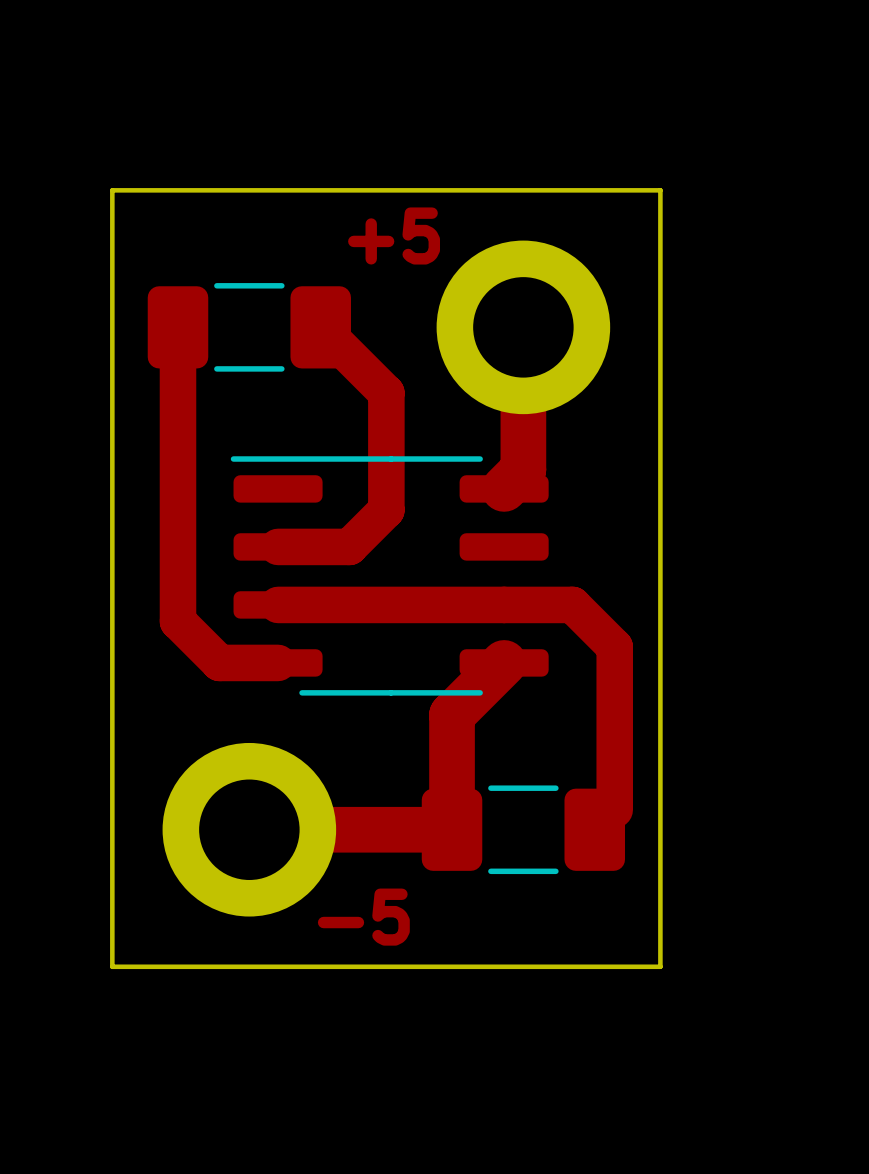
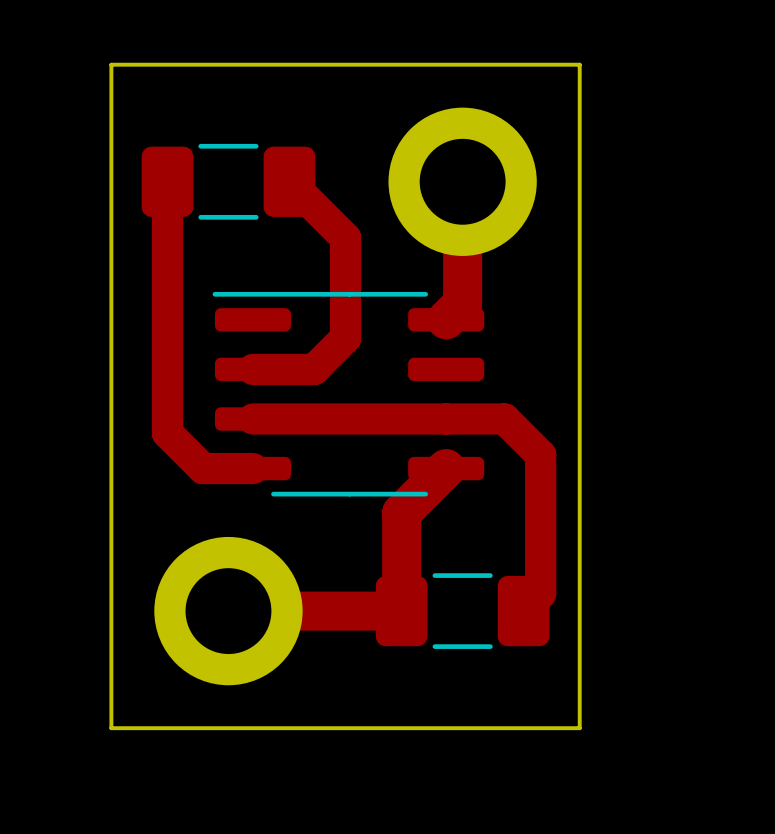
text: +5 (394, 235) -> none
text: -5 (363, 917) -> none

